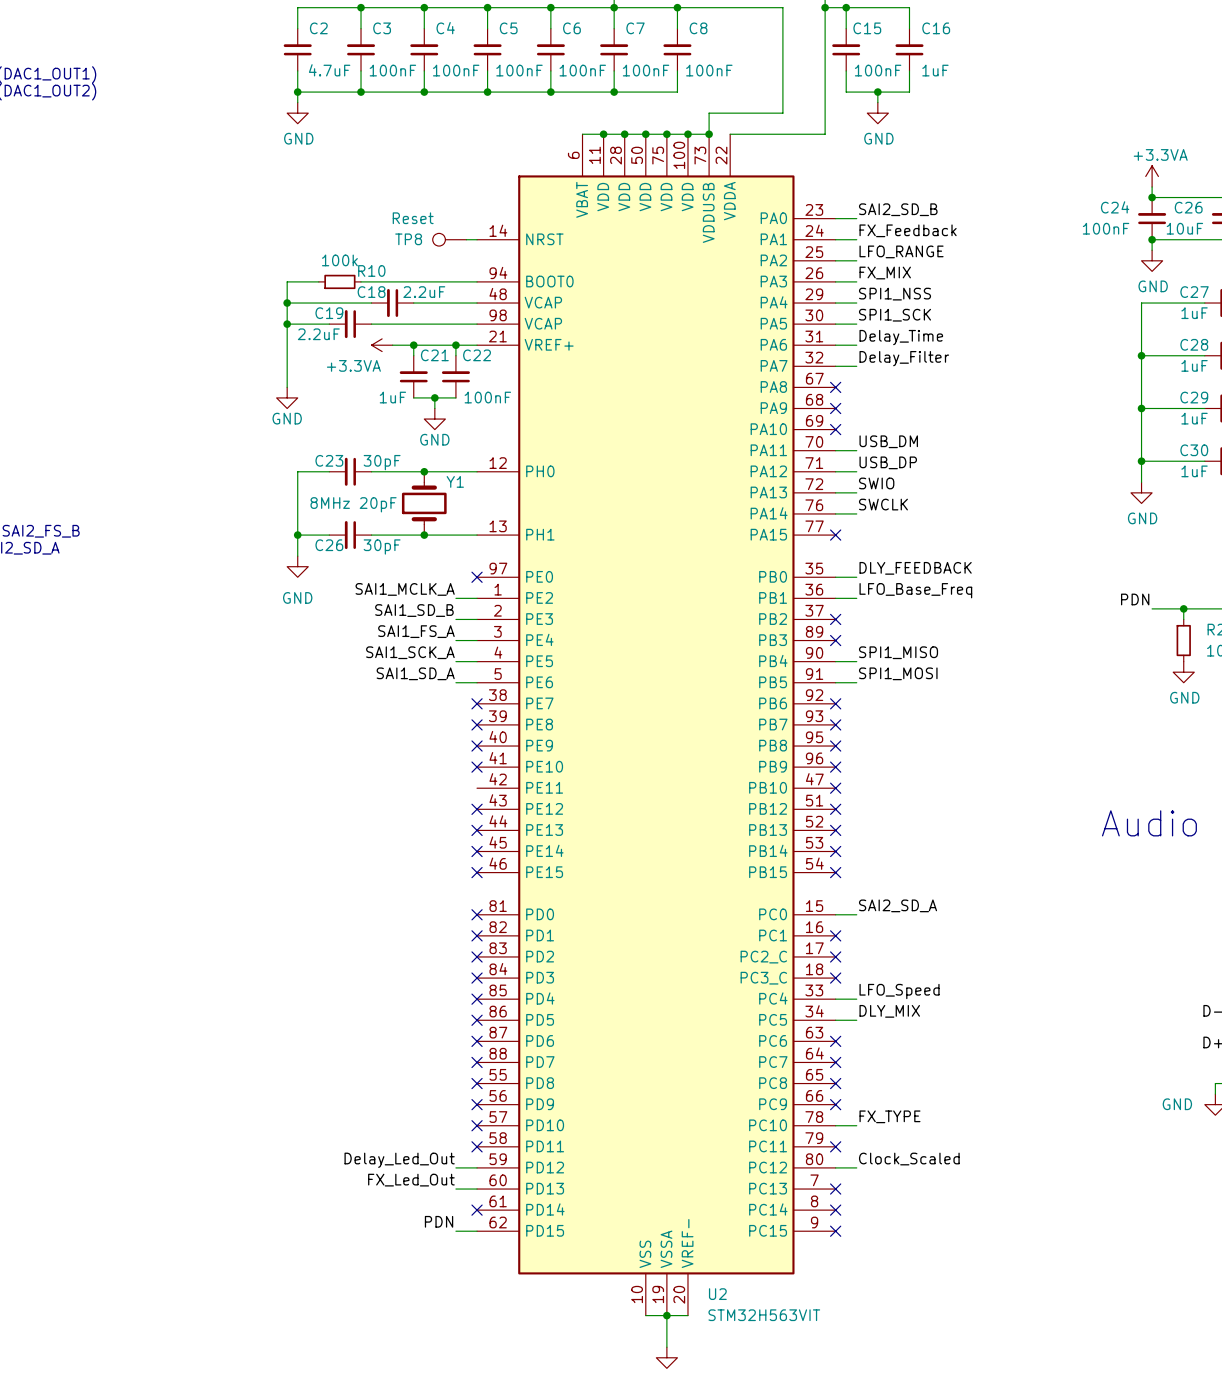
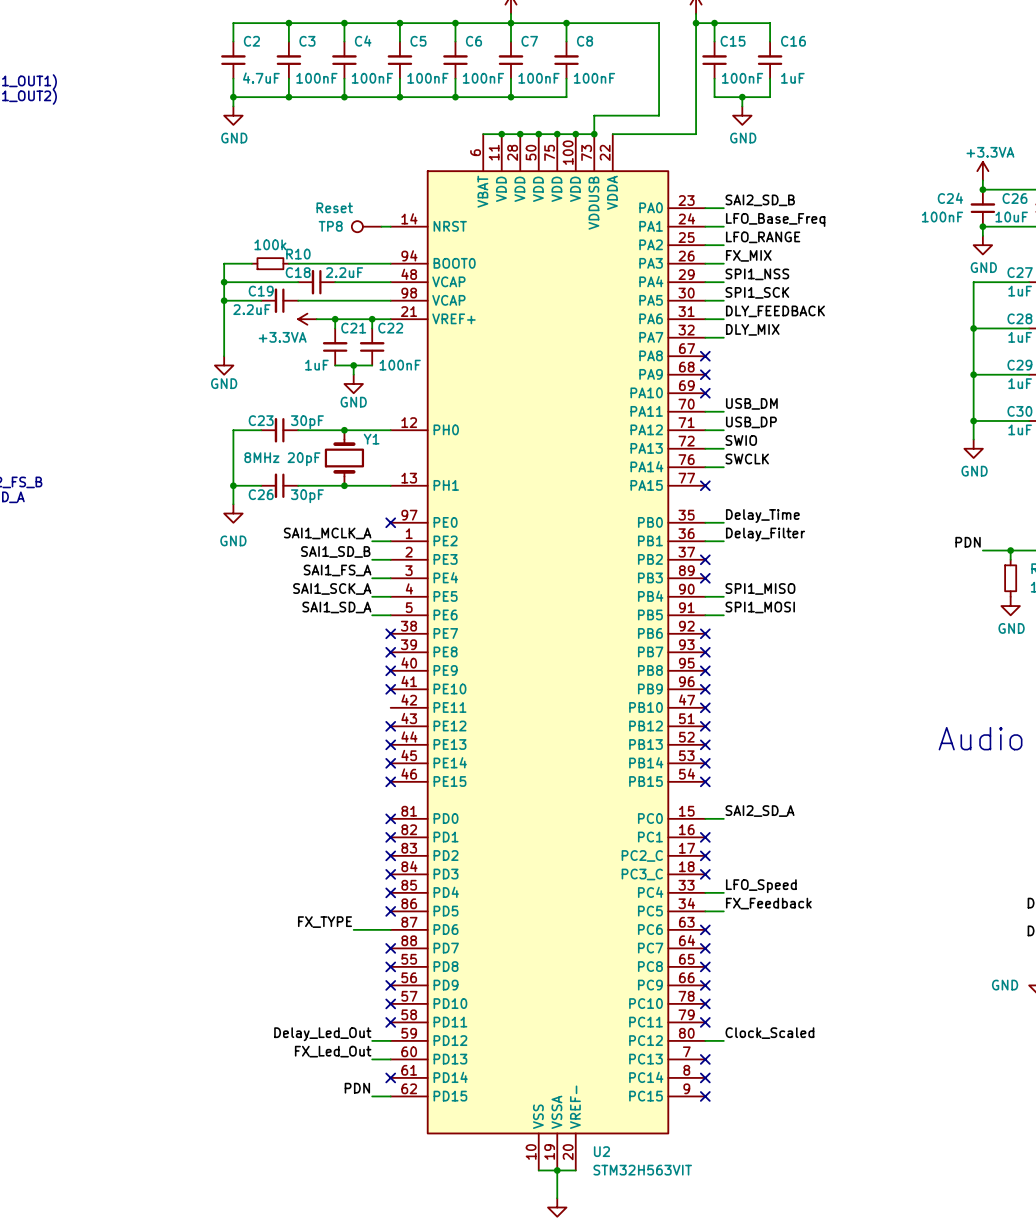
label: FX_Feedback (908, 230) -> LFO_Base_Freq (775, 219)
label: Delay_Time (901, 337) -> DLY_FEEDBACK (775, 311)
label: Delay_Filter (904, 358) -> DLY_MIX (752, 329)
label: DLY_FEEDBACK (915, 568) -> Delay_Time (762, 516)
label: LFO_Base_Freq (915, 590) -> Delay_Filter (765, 534)
label: DLY_MIX (889, 1011) -> FX_Feedback (768, 903)
label: none -> FX_TYPE (324, 922)
wire: none -> (353, 929) (390, 929)
no-connect mark: (477, 1041) -> none
label: FX_TYPE (889, 1116) -> none
wire: (835, 1125) (856, 1125) -> none
no-connect mark: none -> (705, 1003)

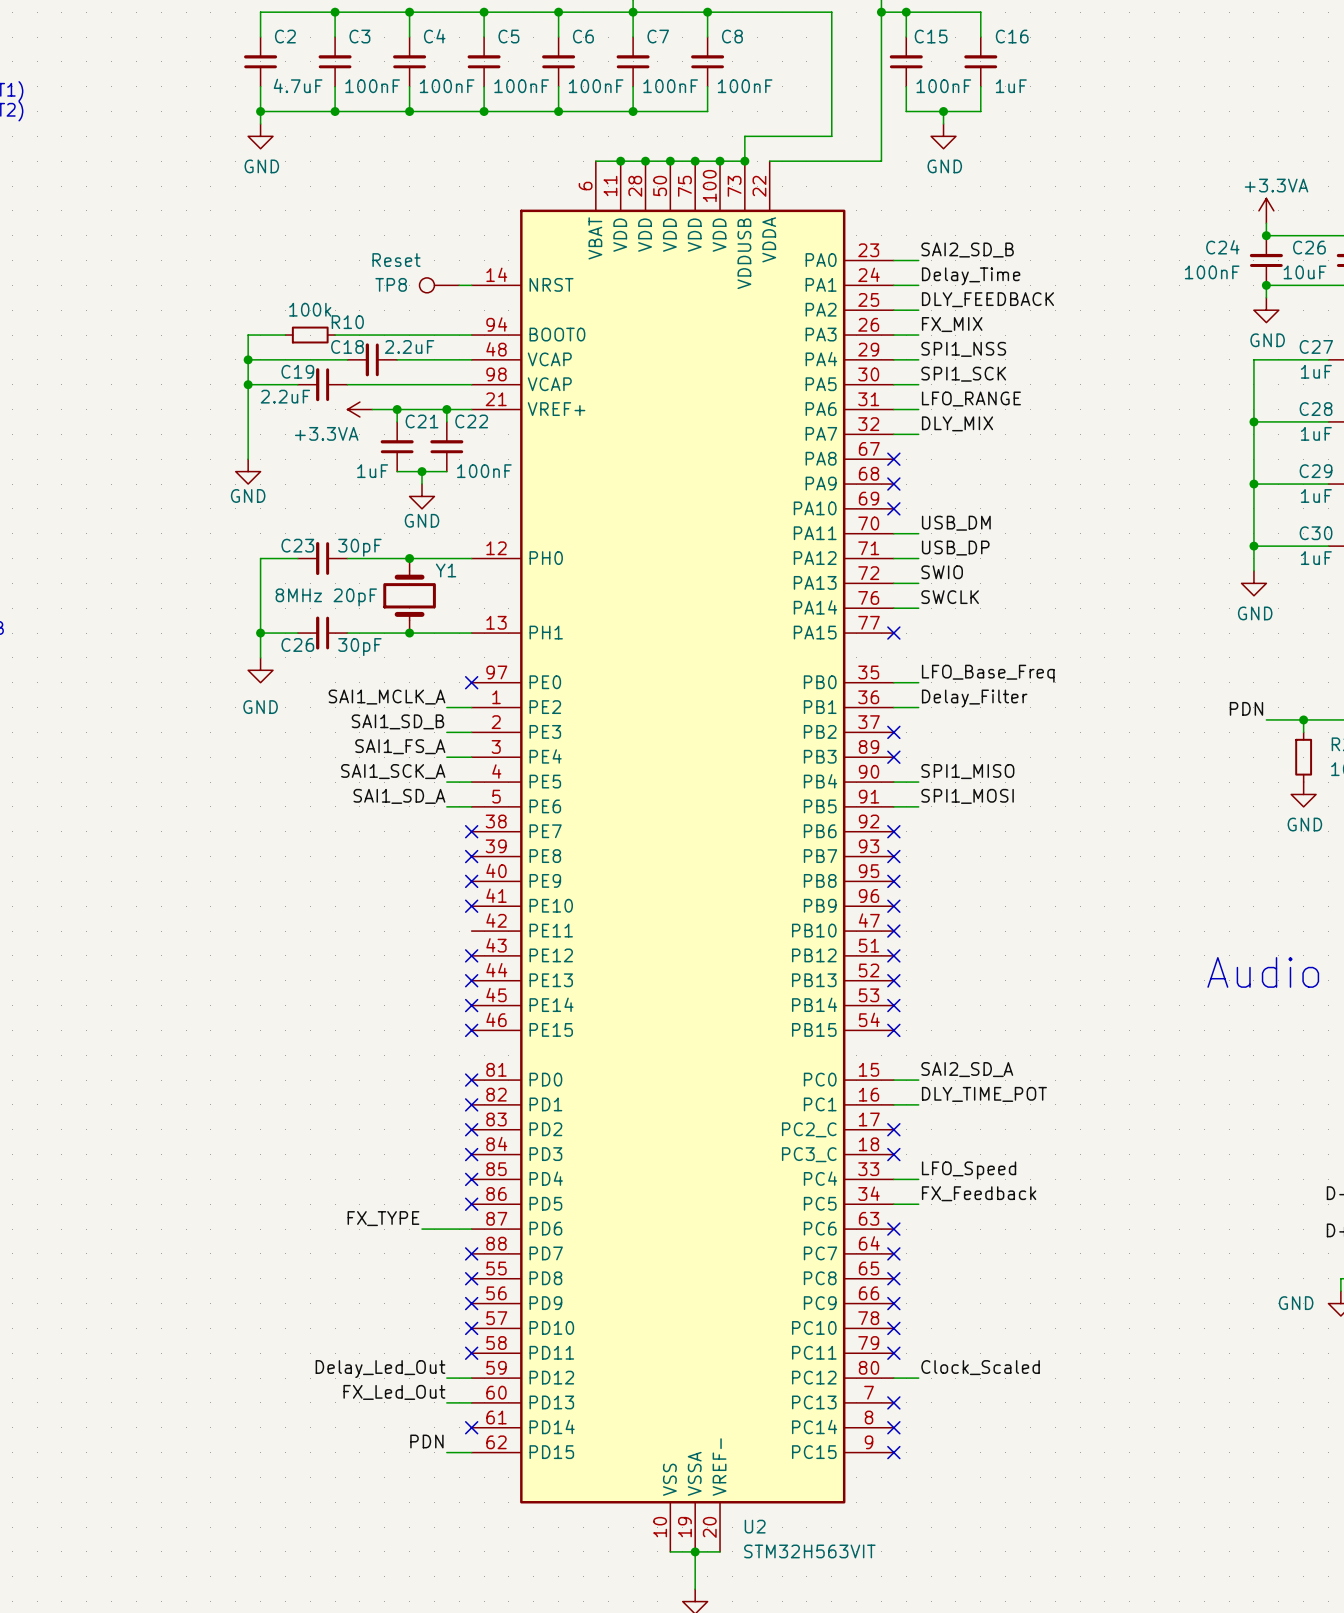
label: LFO_Base_Freq (775, 219) -> Delay_Time (971, 276)
label: LFO_RANGE (763, 237) -> DLY_FEEDBACK (987, 299)
label: DLY_FEEDBACK (775, 311) -> LFO_RANGE (971, 399)
label: Delay_Time (762, 516) -> LFO_Base_Freq (988, 673)
label: none -> DLY_TIME_POT (984, 1094)
wire: none -> (893, 1104) (918, 1104)
no-connect mark: (705, 837) -> none

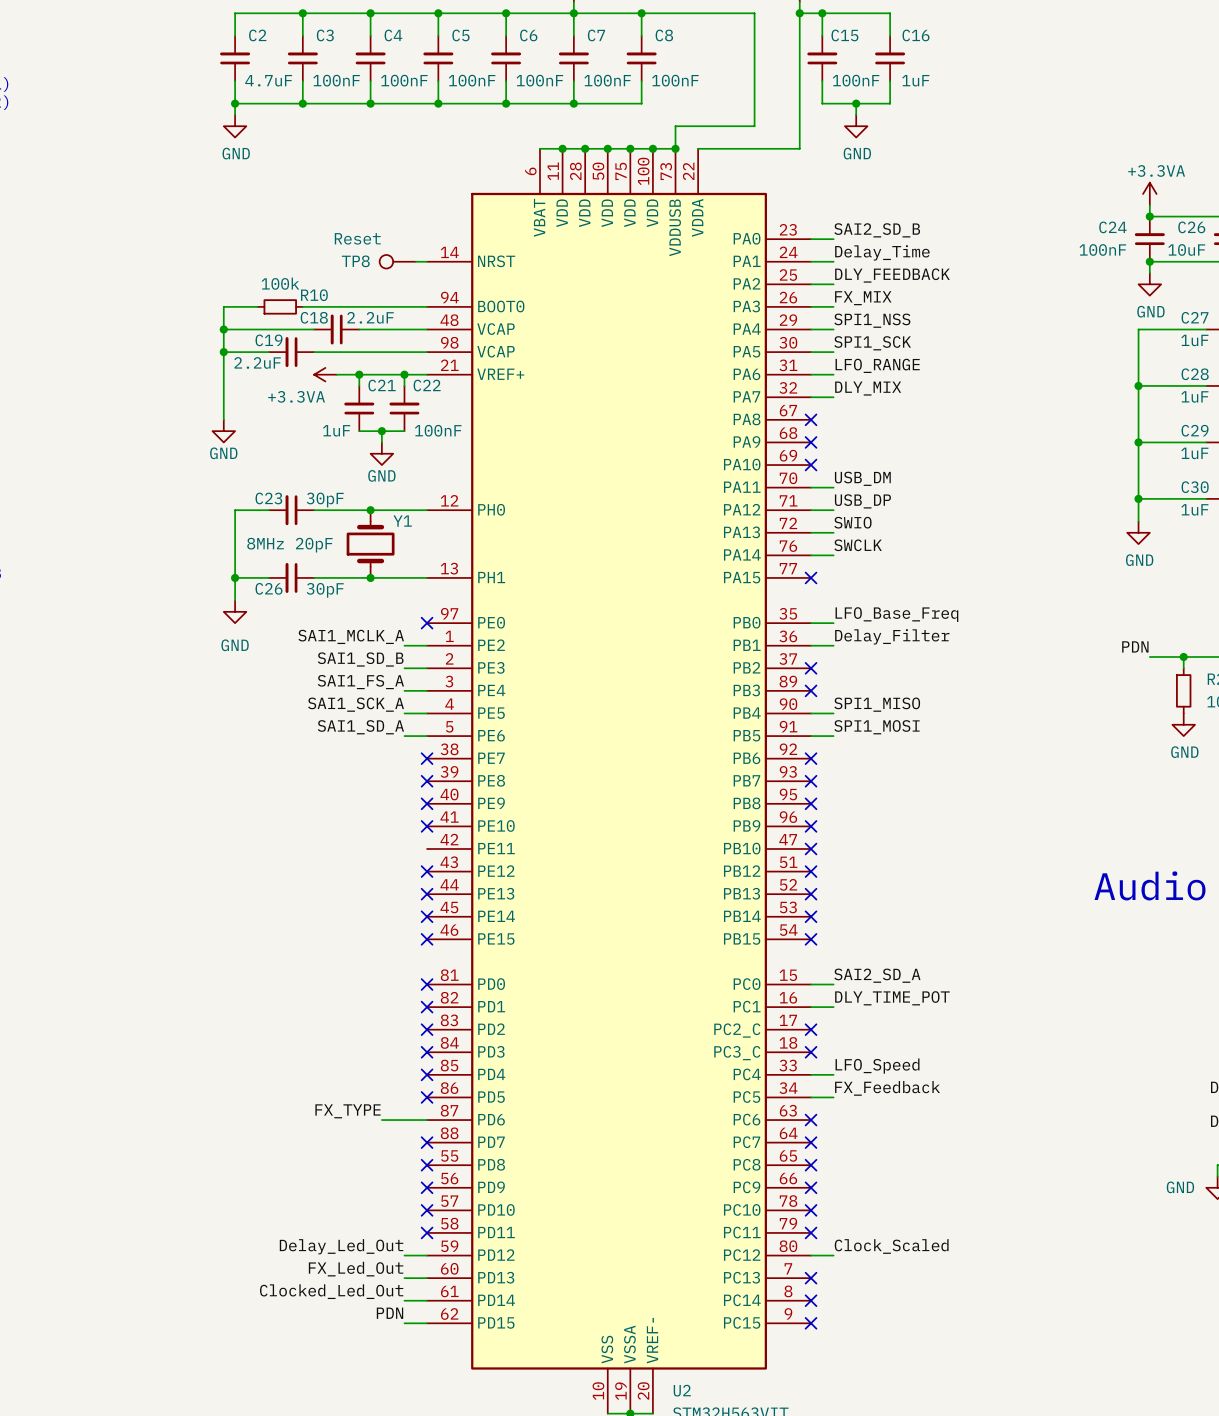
label: none -> Clocked_Led_Out (331, 1291)
wire: none -> (404, 1300) (427, 1300)
no-connect mark: (471, 1427) -> none

